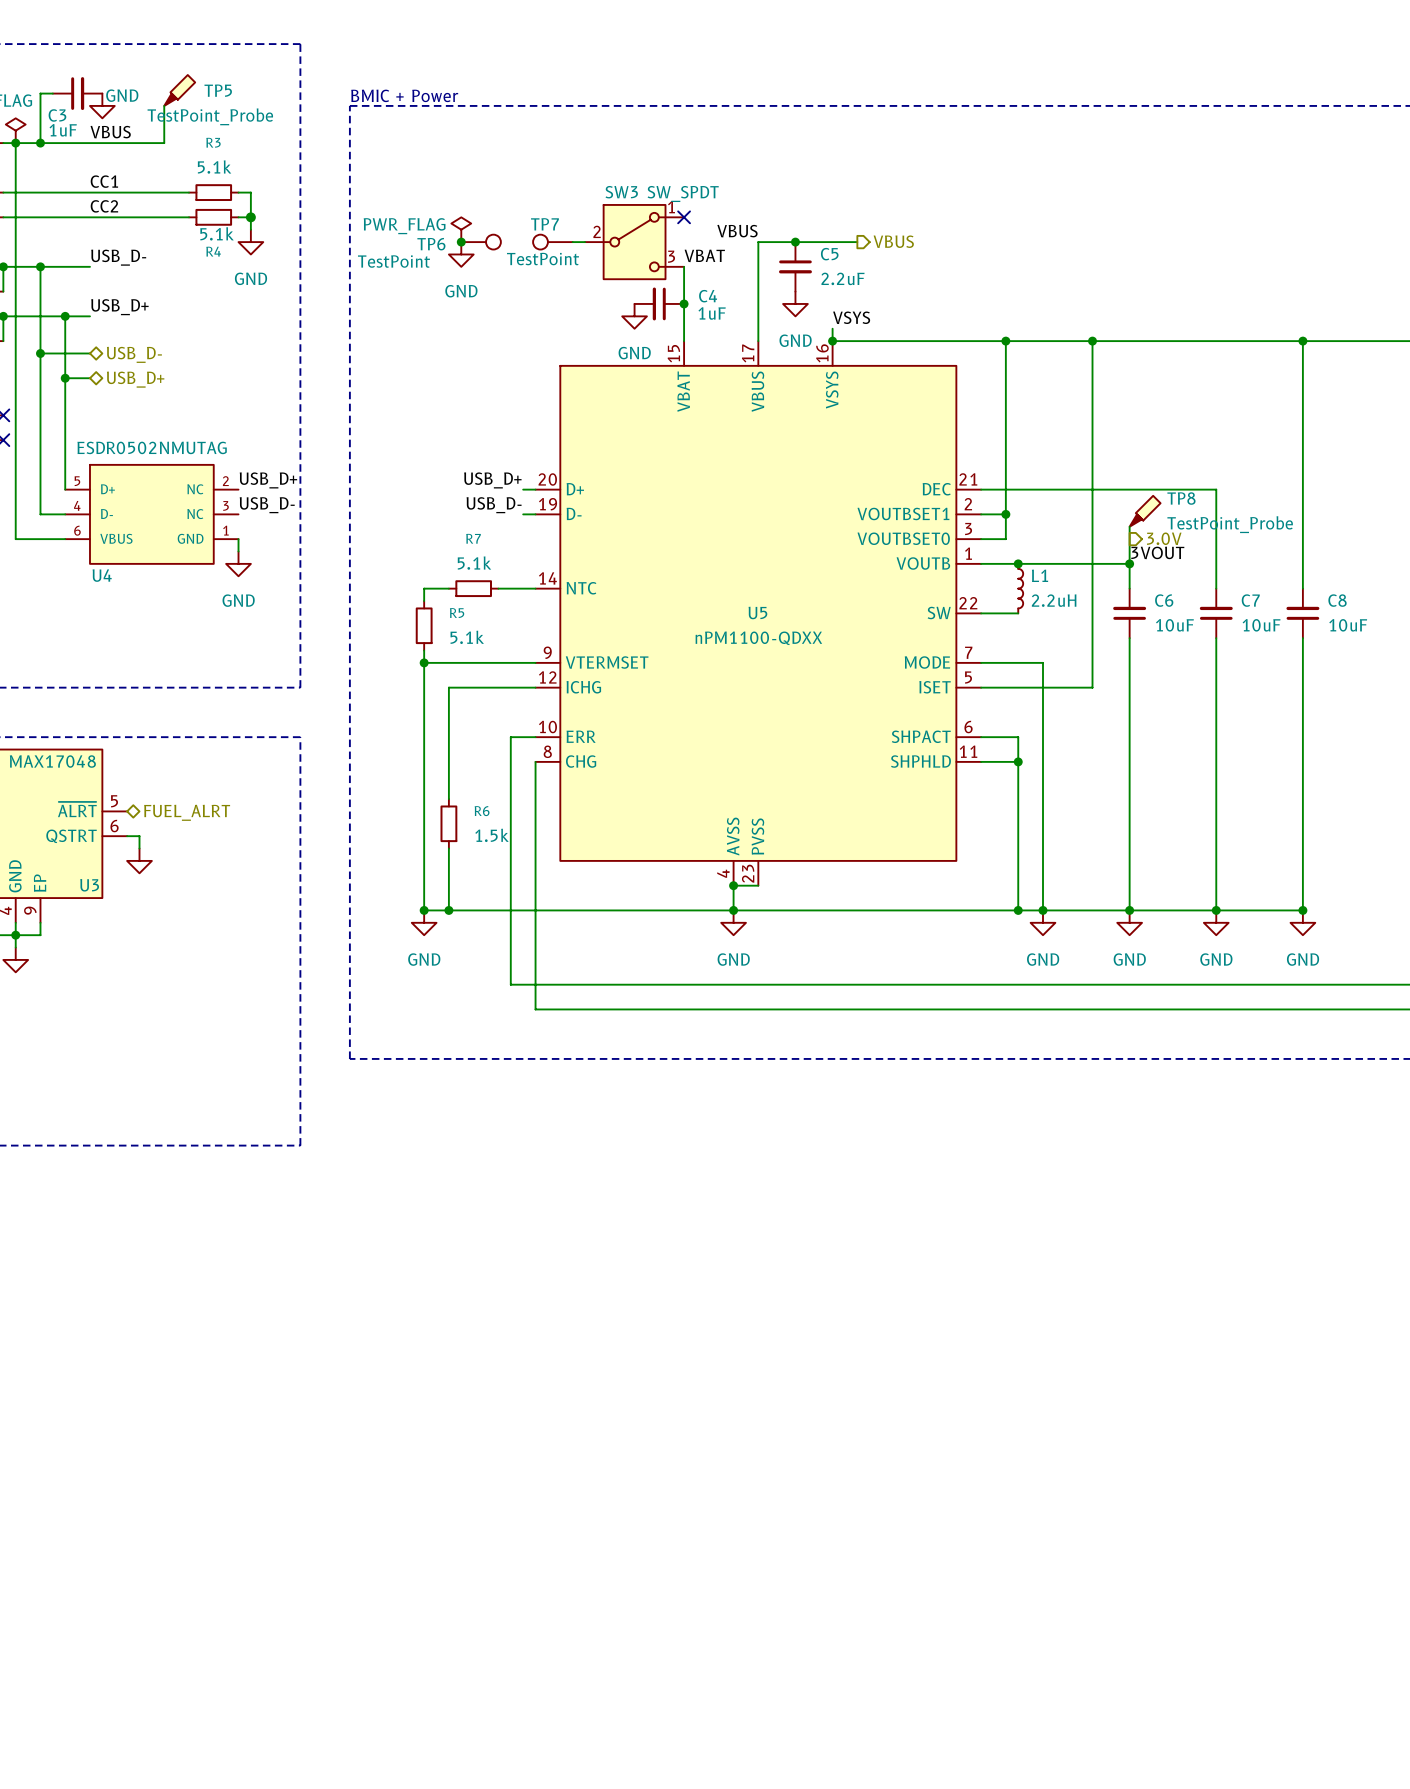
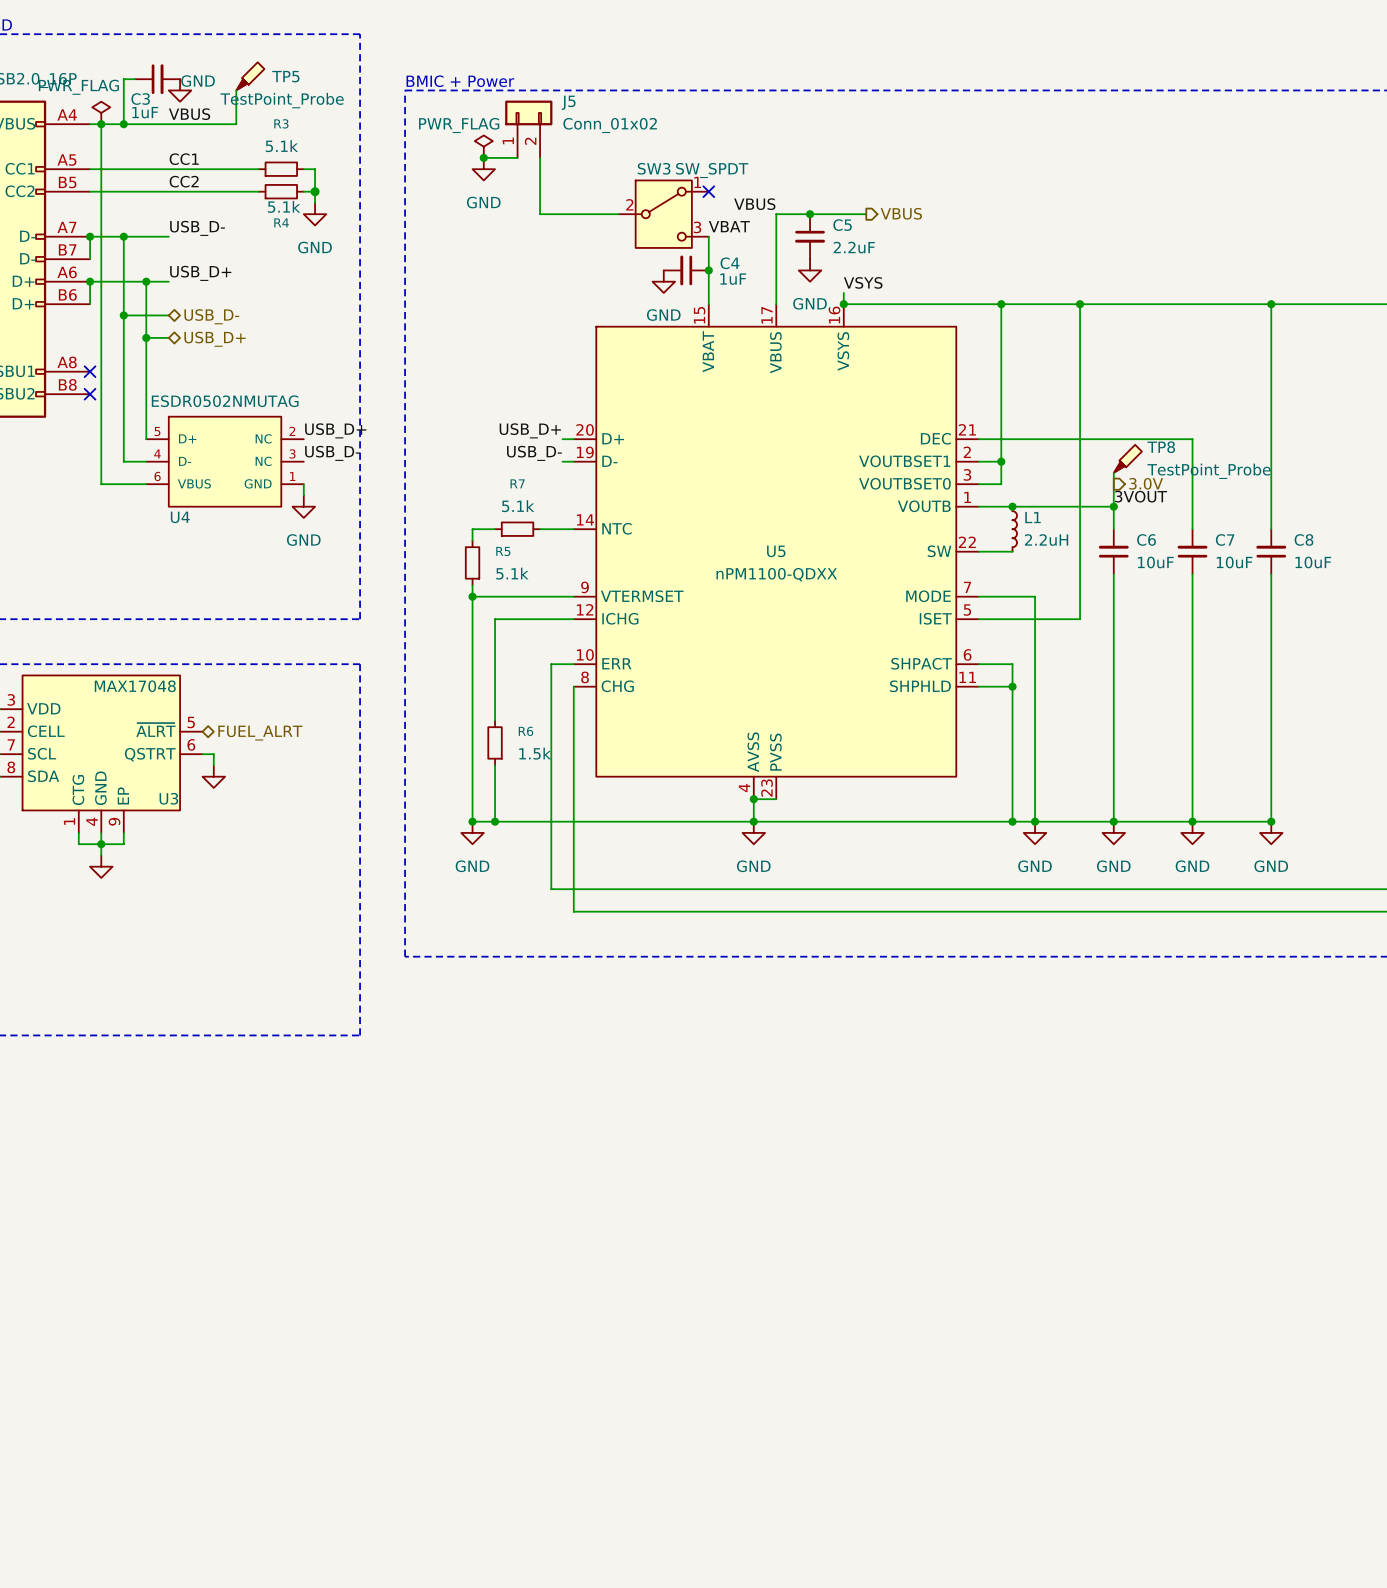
J5: none -> Conn_01x02 (528, 129)
wire: none -> (483, 157) (517, 157)
junction: none -> (483, 157)
wire: none -> (540, 157) (540, 214) (607, 214)
power symbol text position: PWR_FLAG (404, 226) -> PWR_FLAG (459, 125)
power symbol position: PWR_FLAG (461, 229) -> PWR_FLAG (483, 146)
junction: (461, 242) -> none
TP6: TestPoint (481, 242) -> none
TP7: TestPoint (552, 242) -> none
power symbol position: GND (461, 254) -> GND (483, 169)

